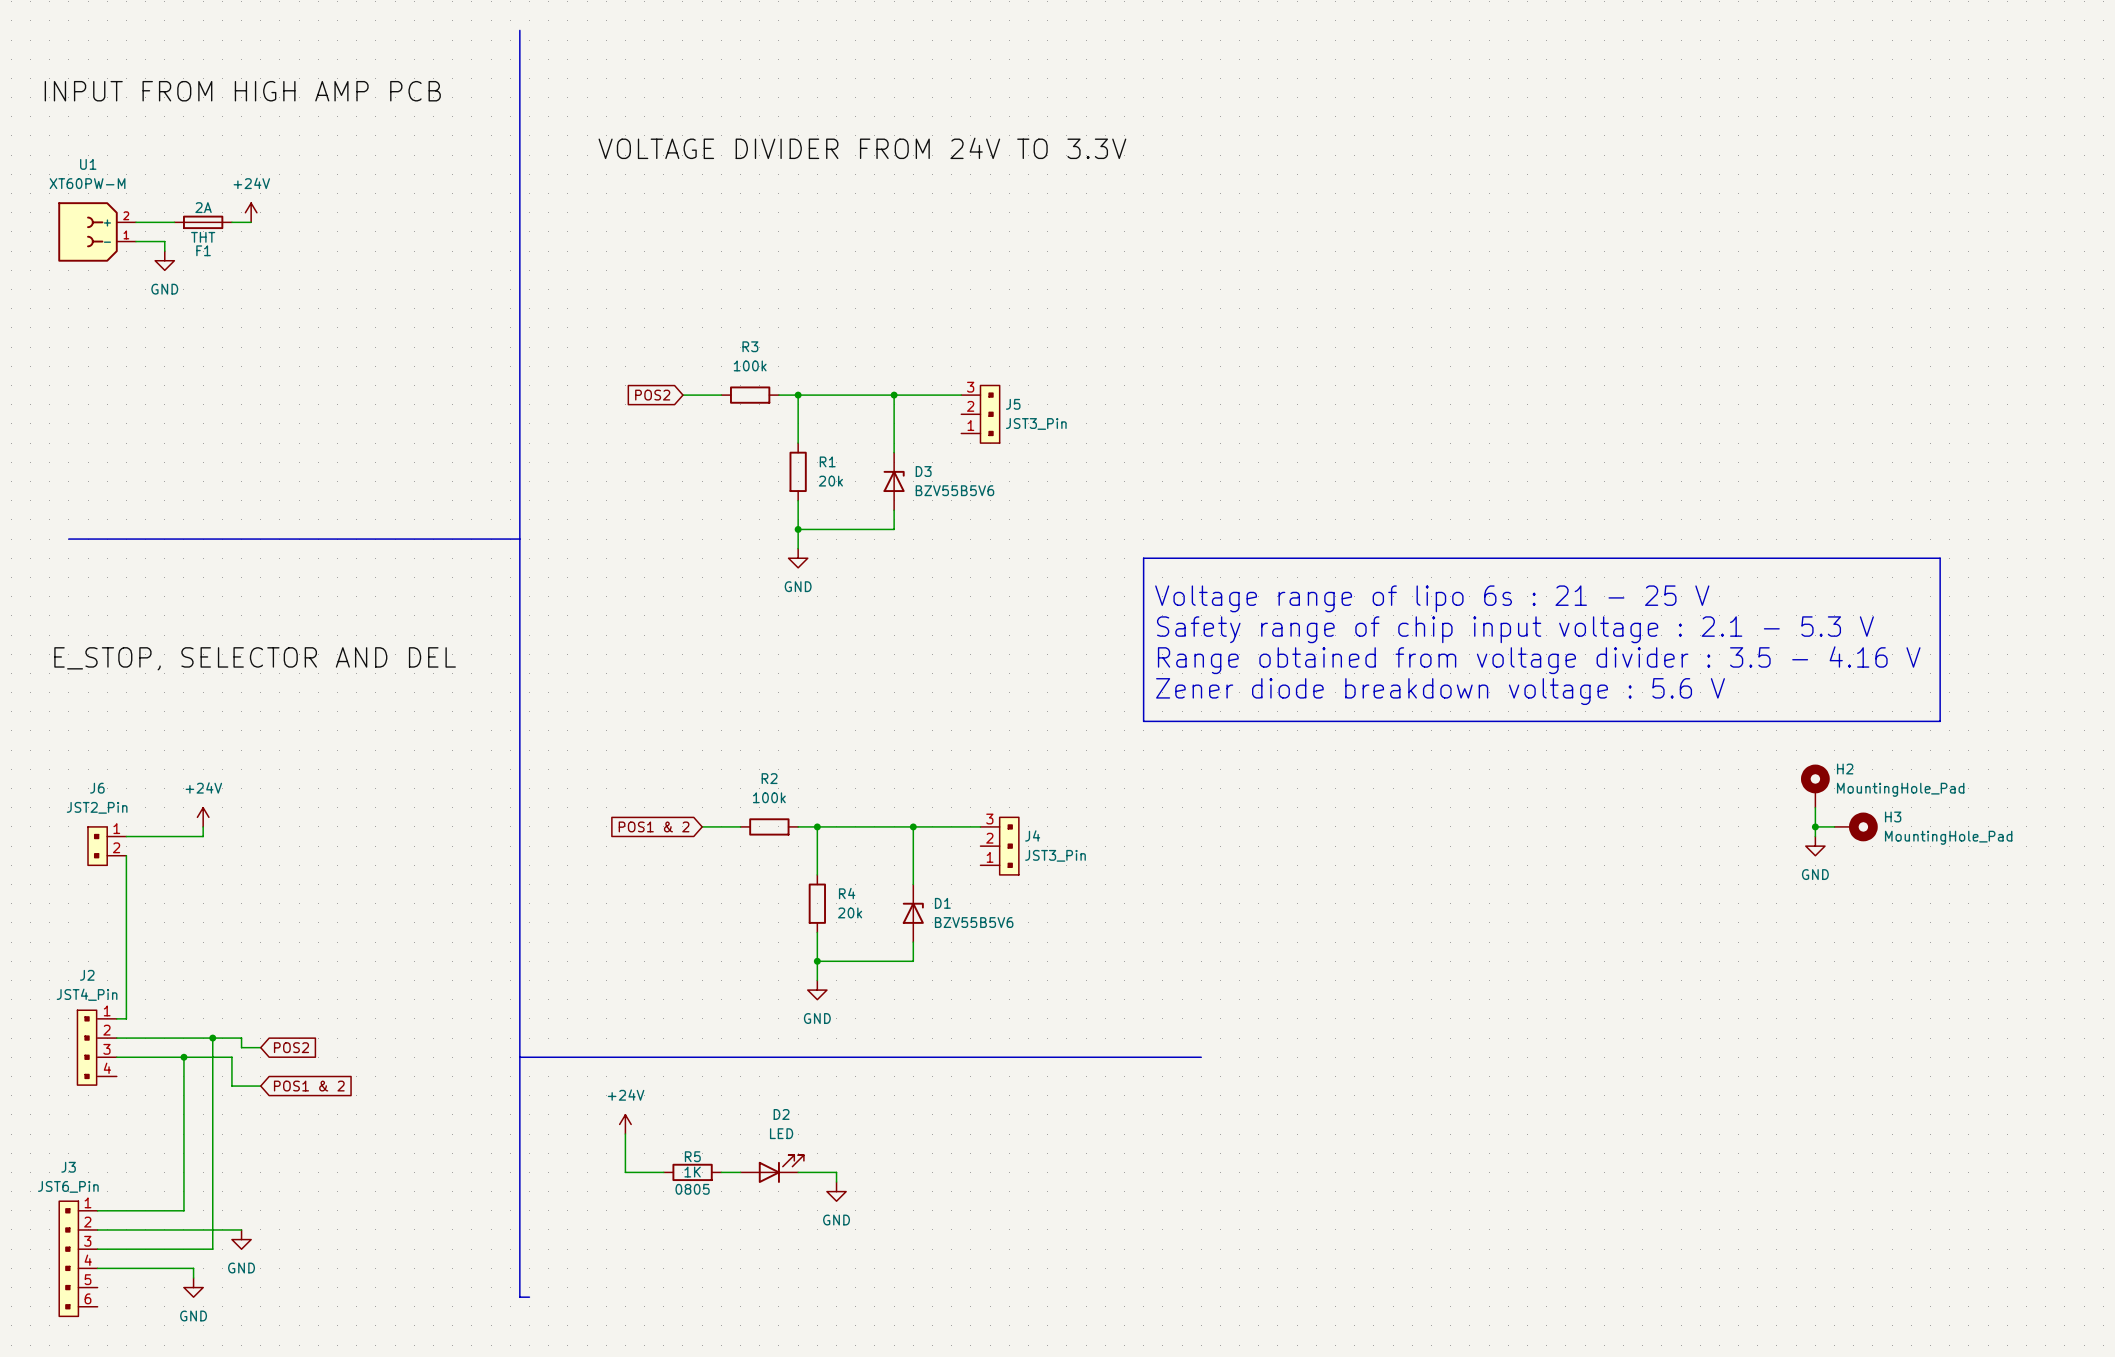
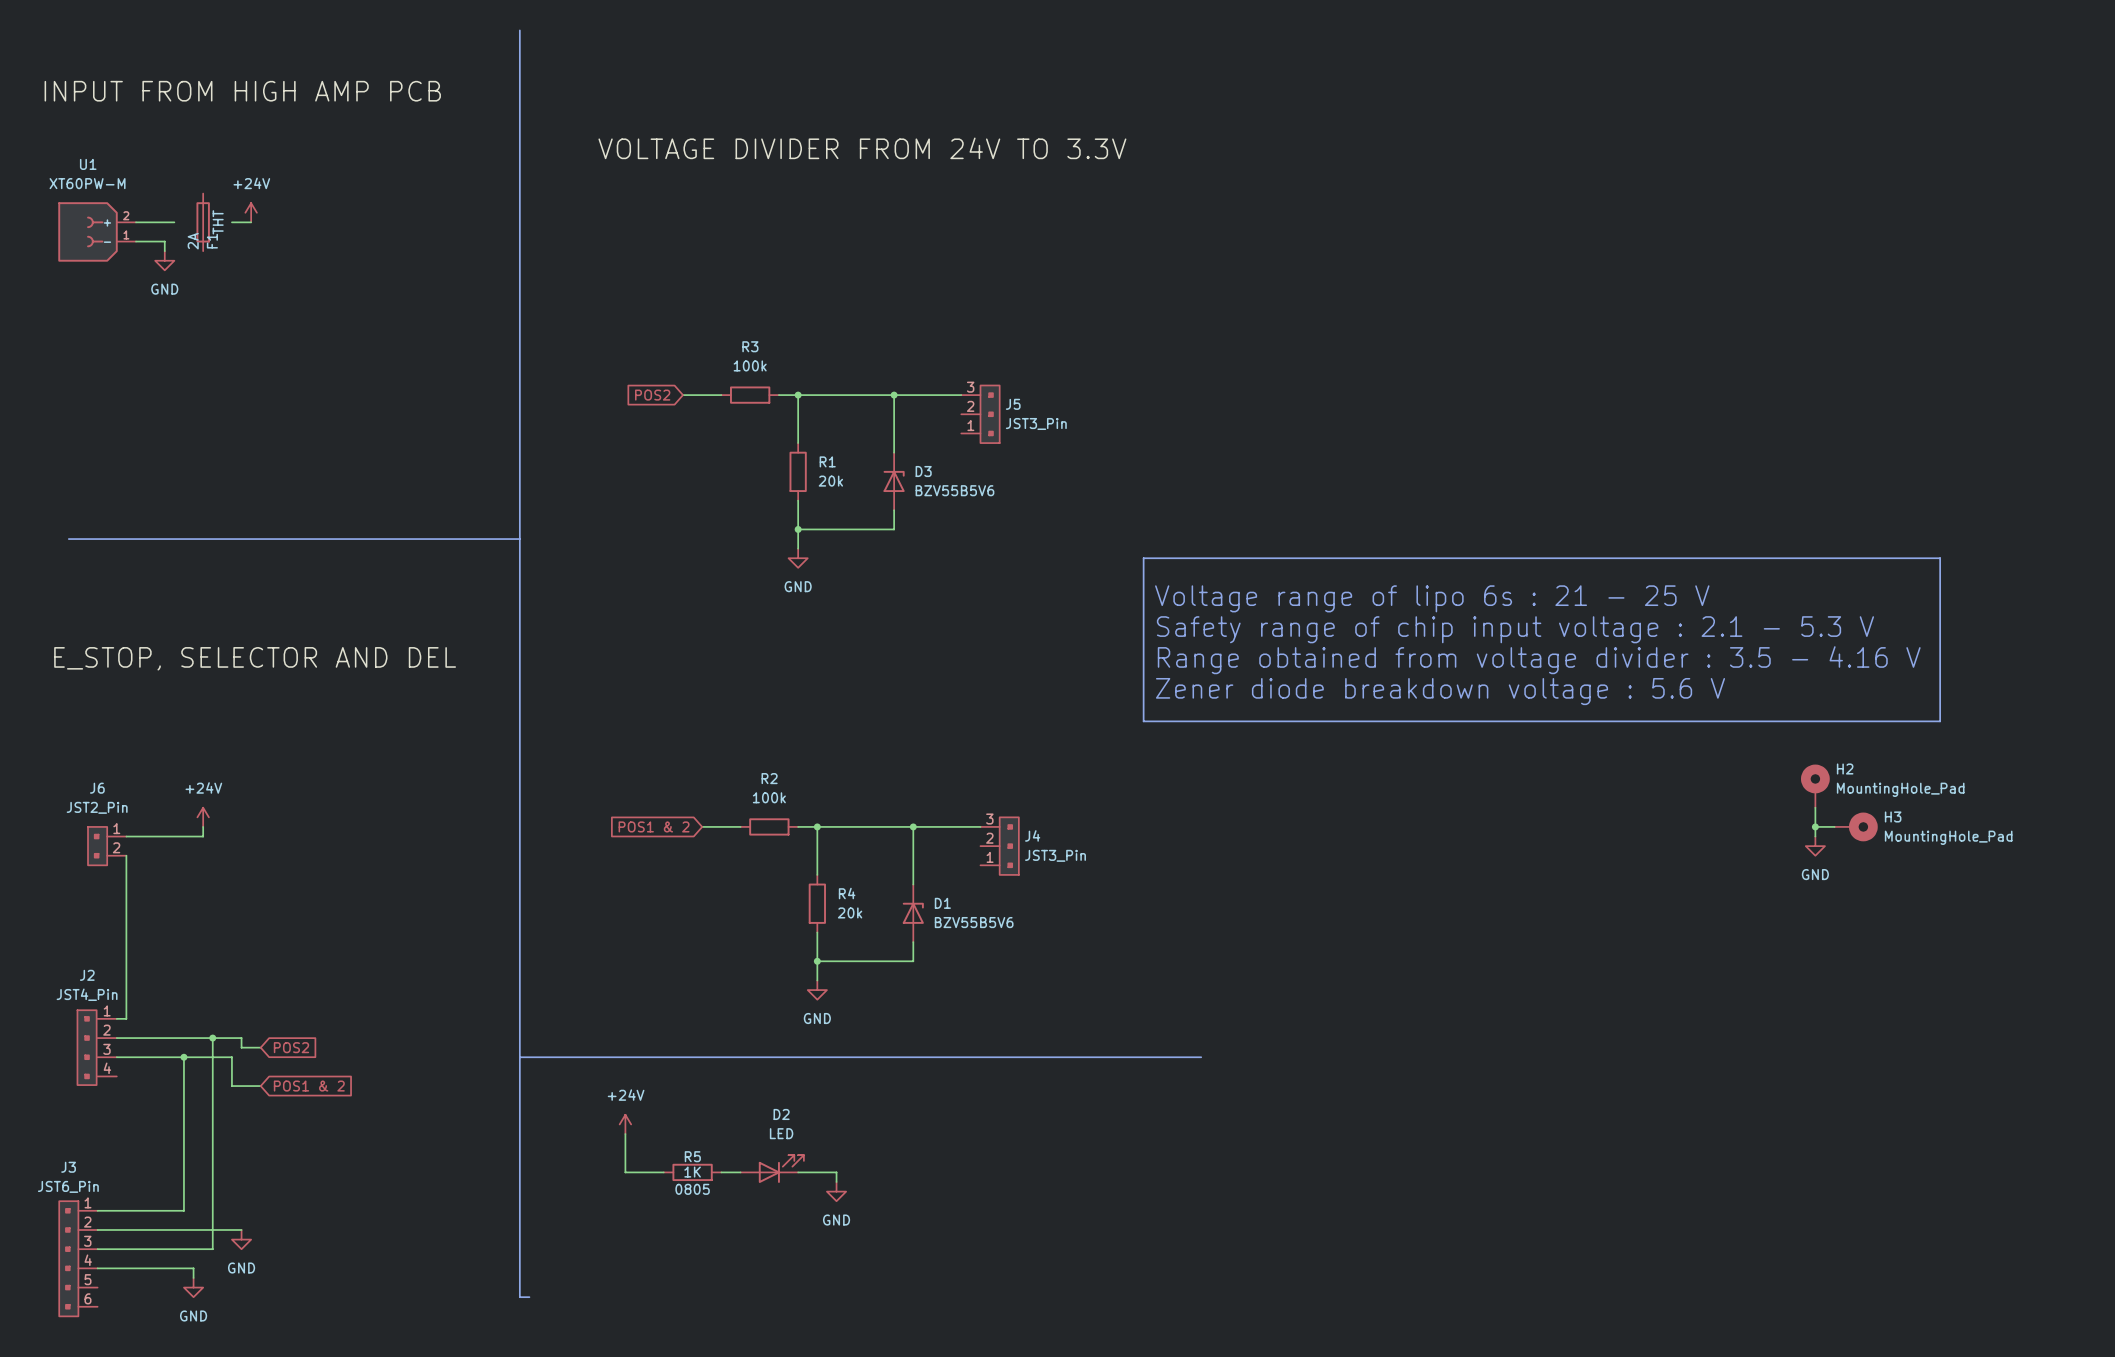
F1 value position: 2A (203, 207) -> 2A (193, 241)
F1 rotation: 0° (203, 222) -> 90° clockwise (203, 222)
F1 text position: THT (203, 237) -> THT (218, 222)

